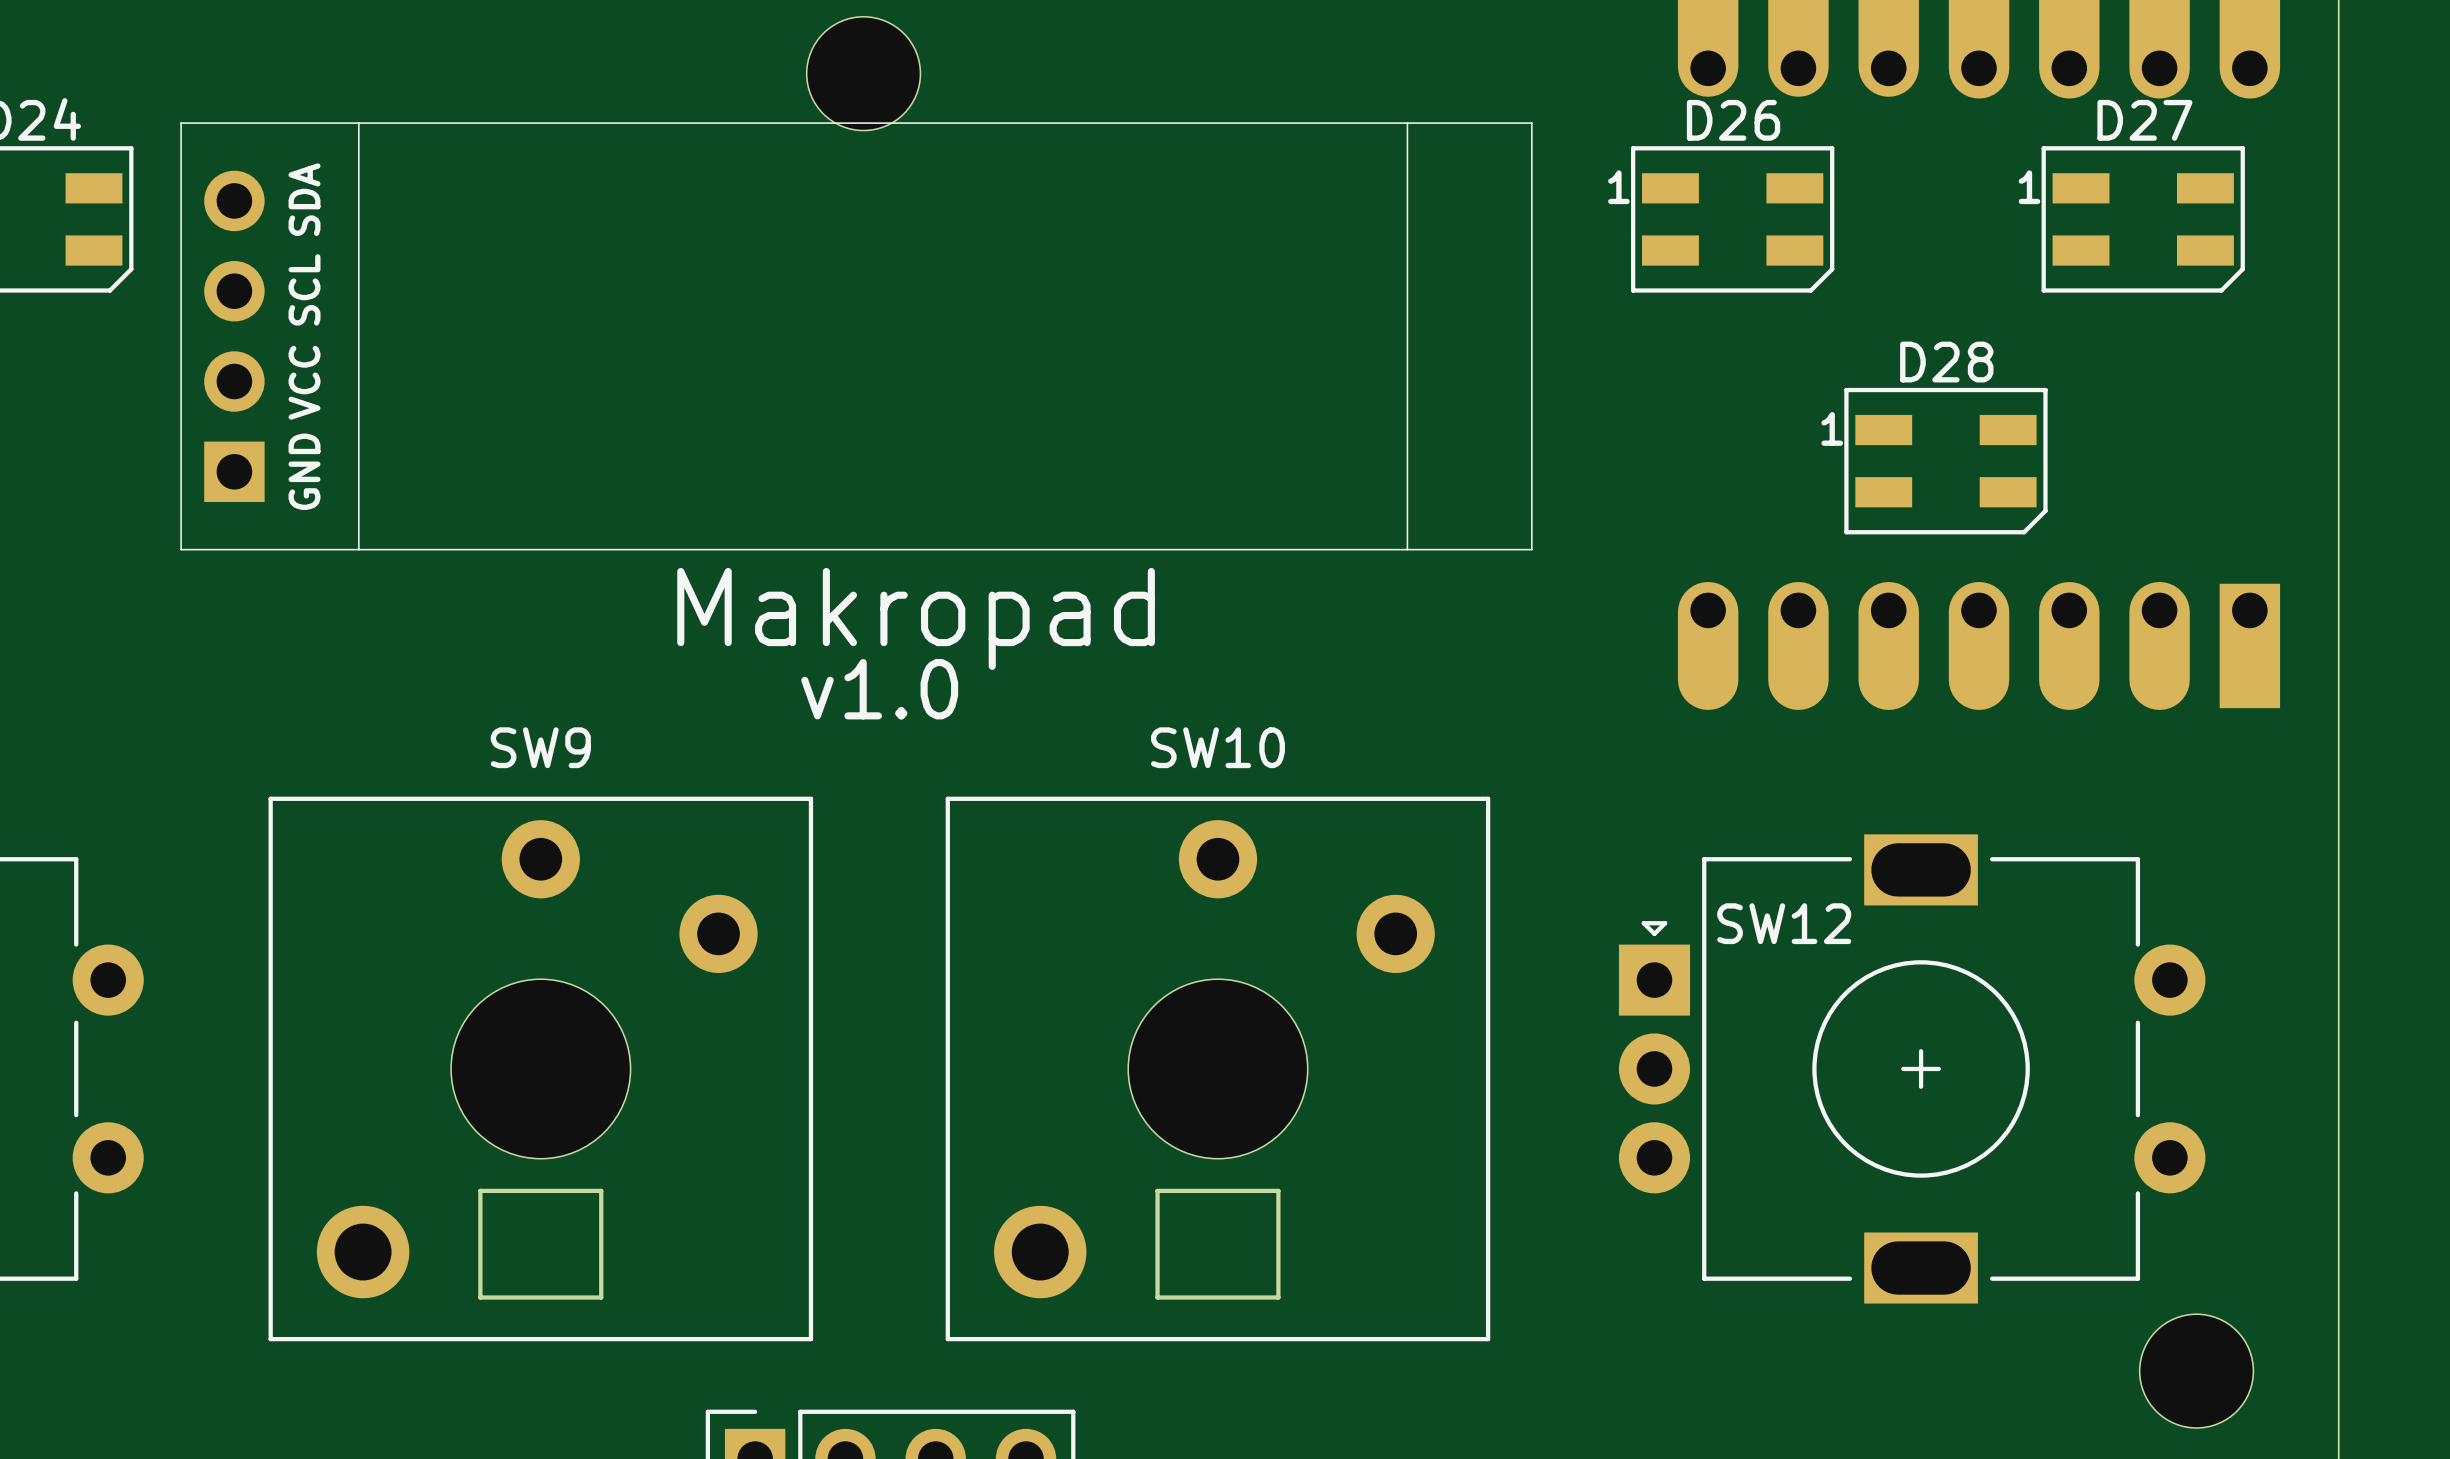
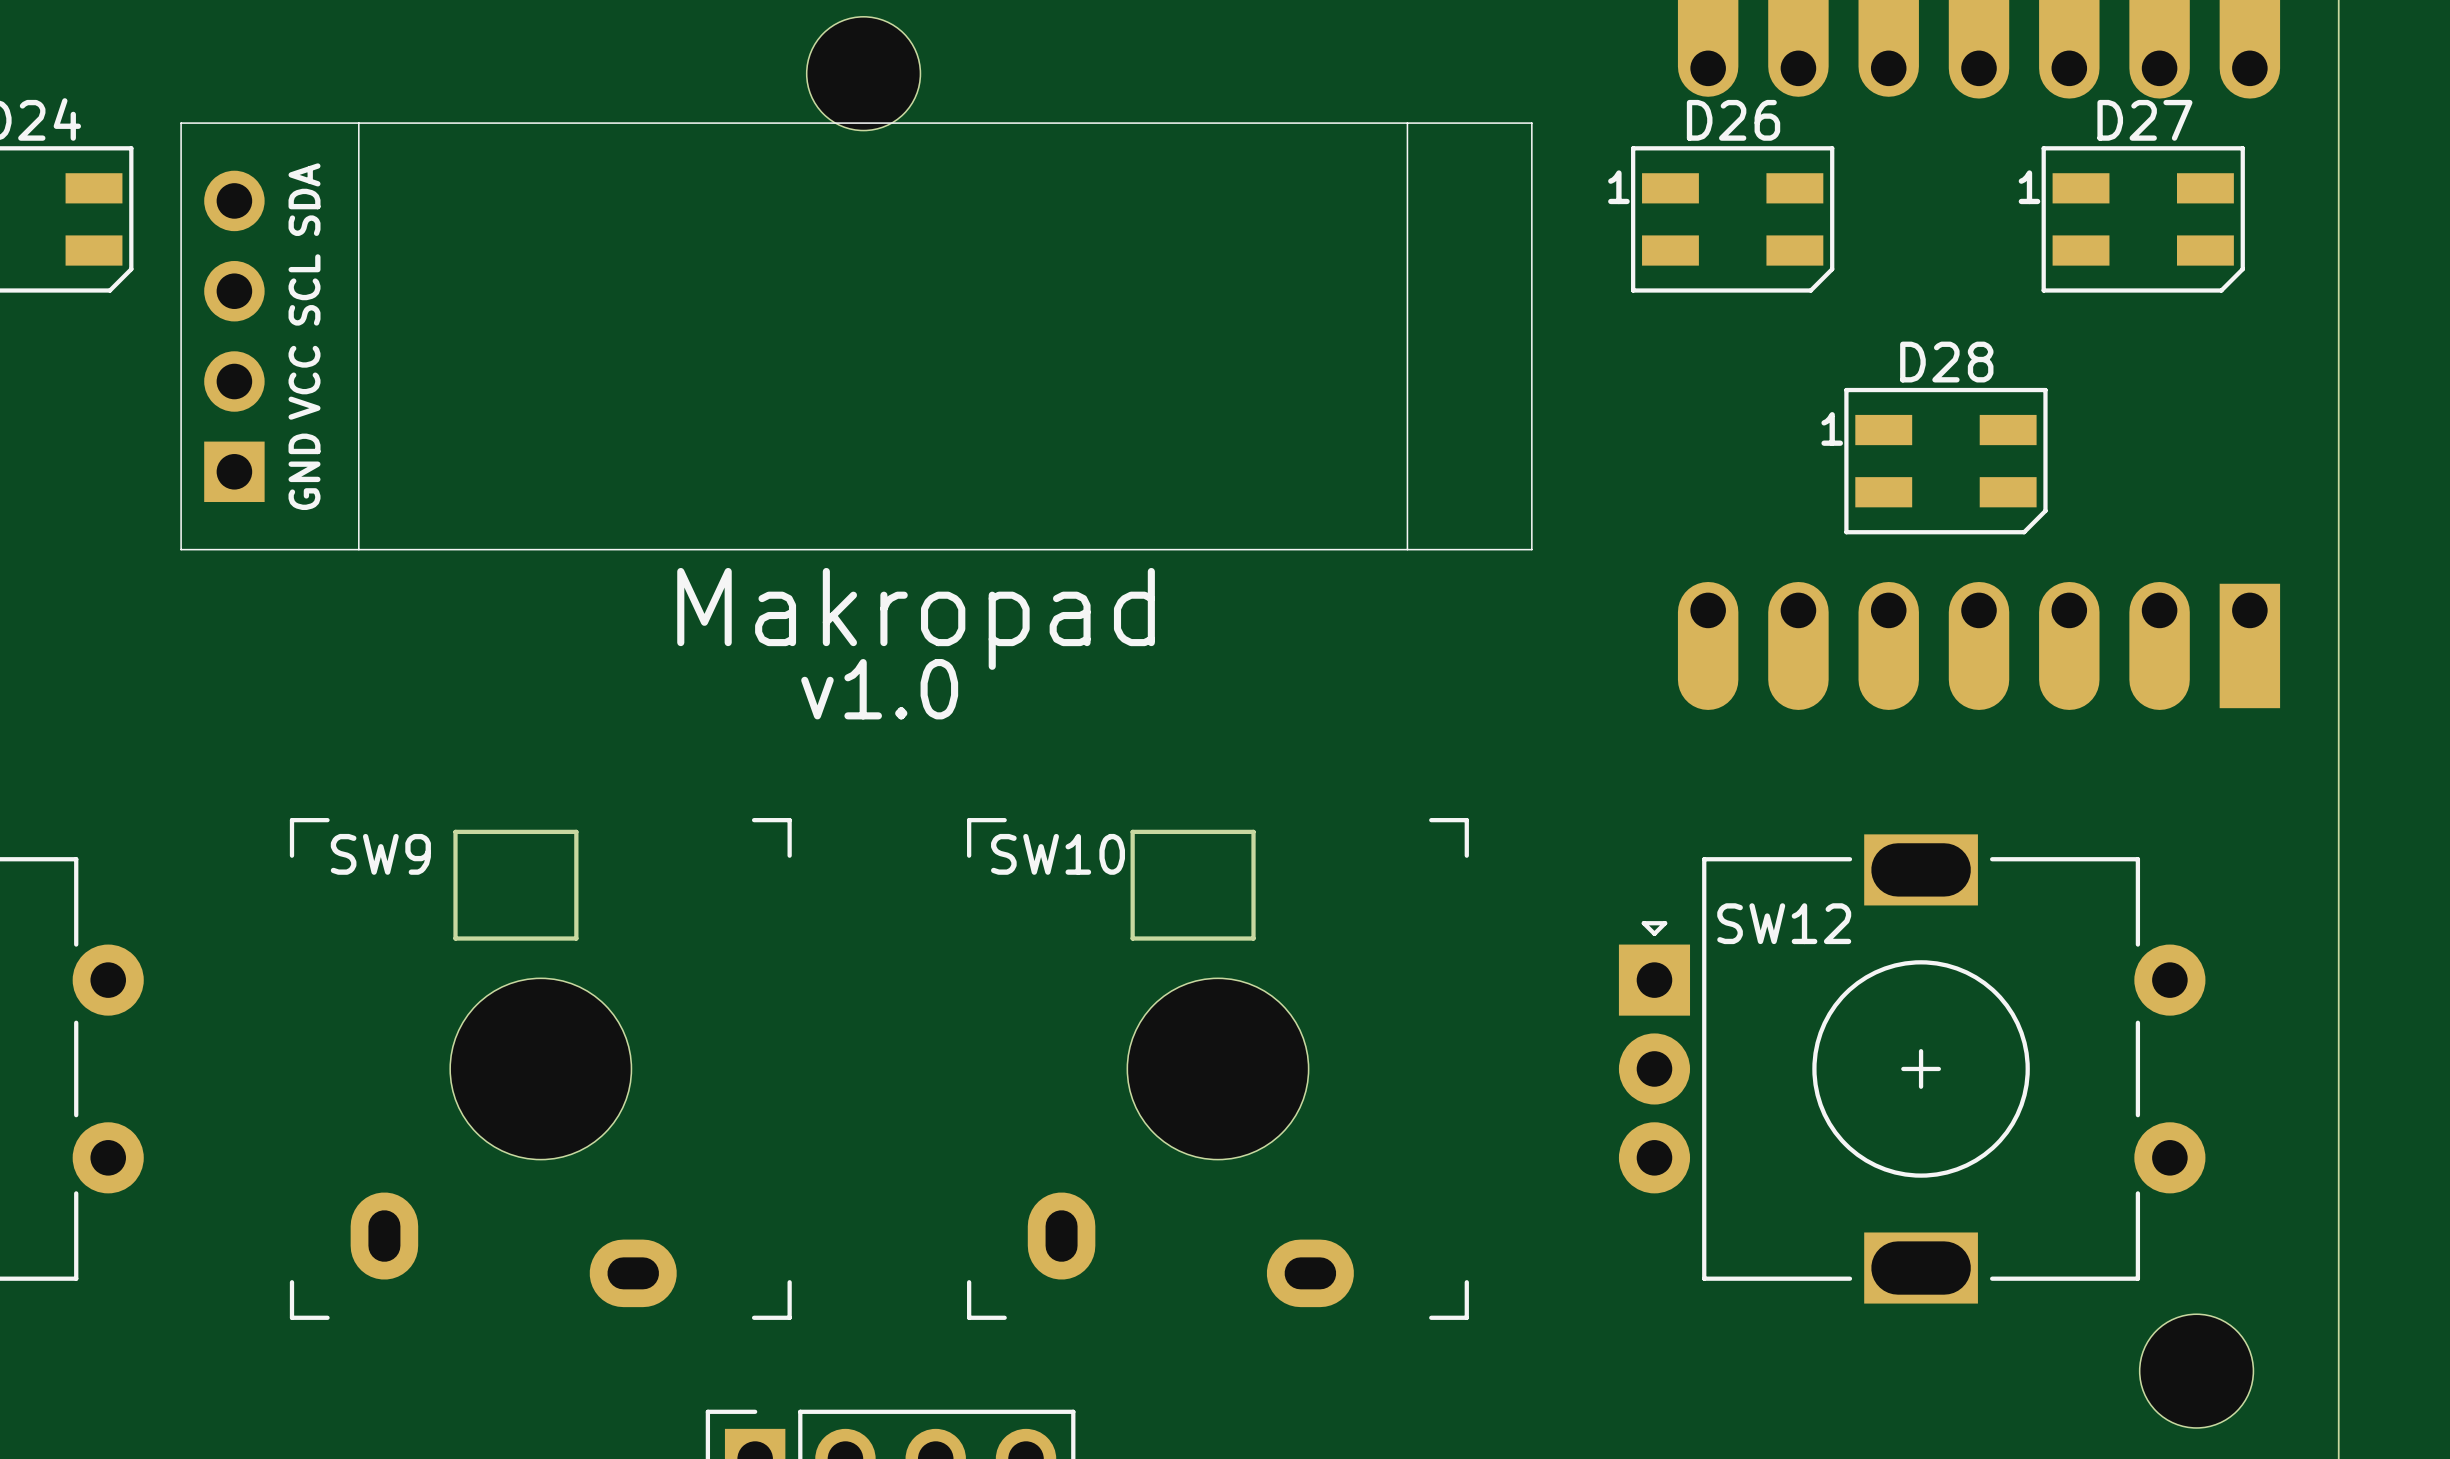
SW9 name position: SW9 (540, 747) -> SW9 (380, 854)
SW10 name position: SW10 (1217, 747) -> SW10 (1058, 854)
SW9 footprint: [268, 796, 814, 1342] -> [289, 818, 792, 1320]
SW10 footprint: [945, 796, 1491, 1342] -> [967, 818, 1469, 1320]
part position: (540, 1244) -> (515, 885)
part position: (1217, 1244) -> (1193, 885)

